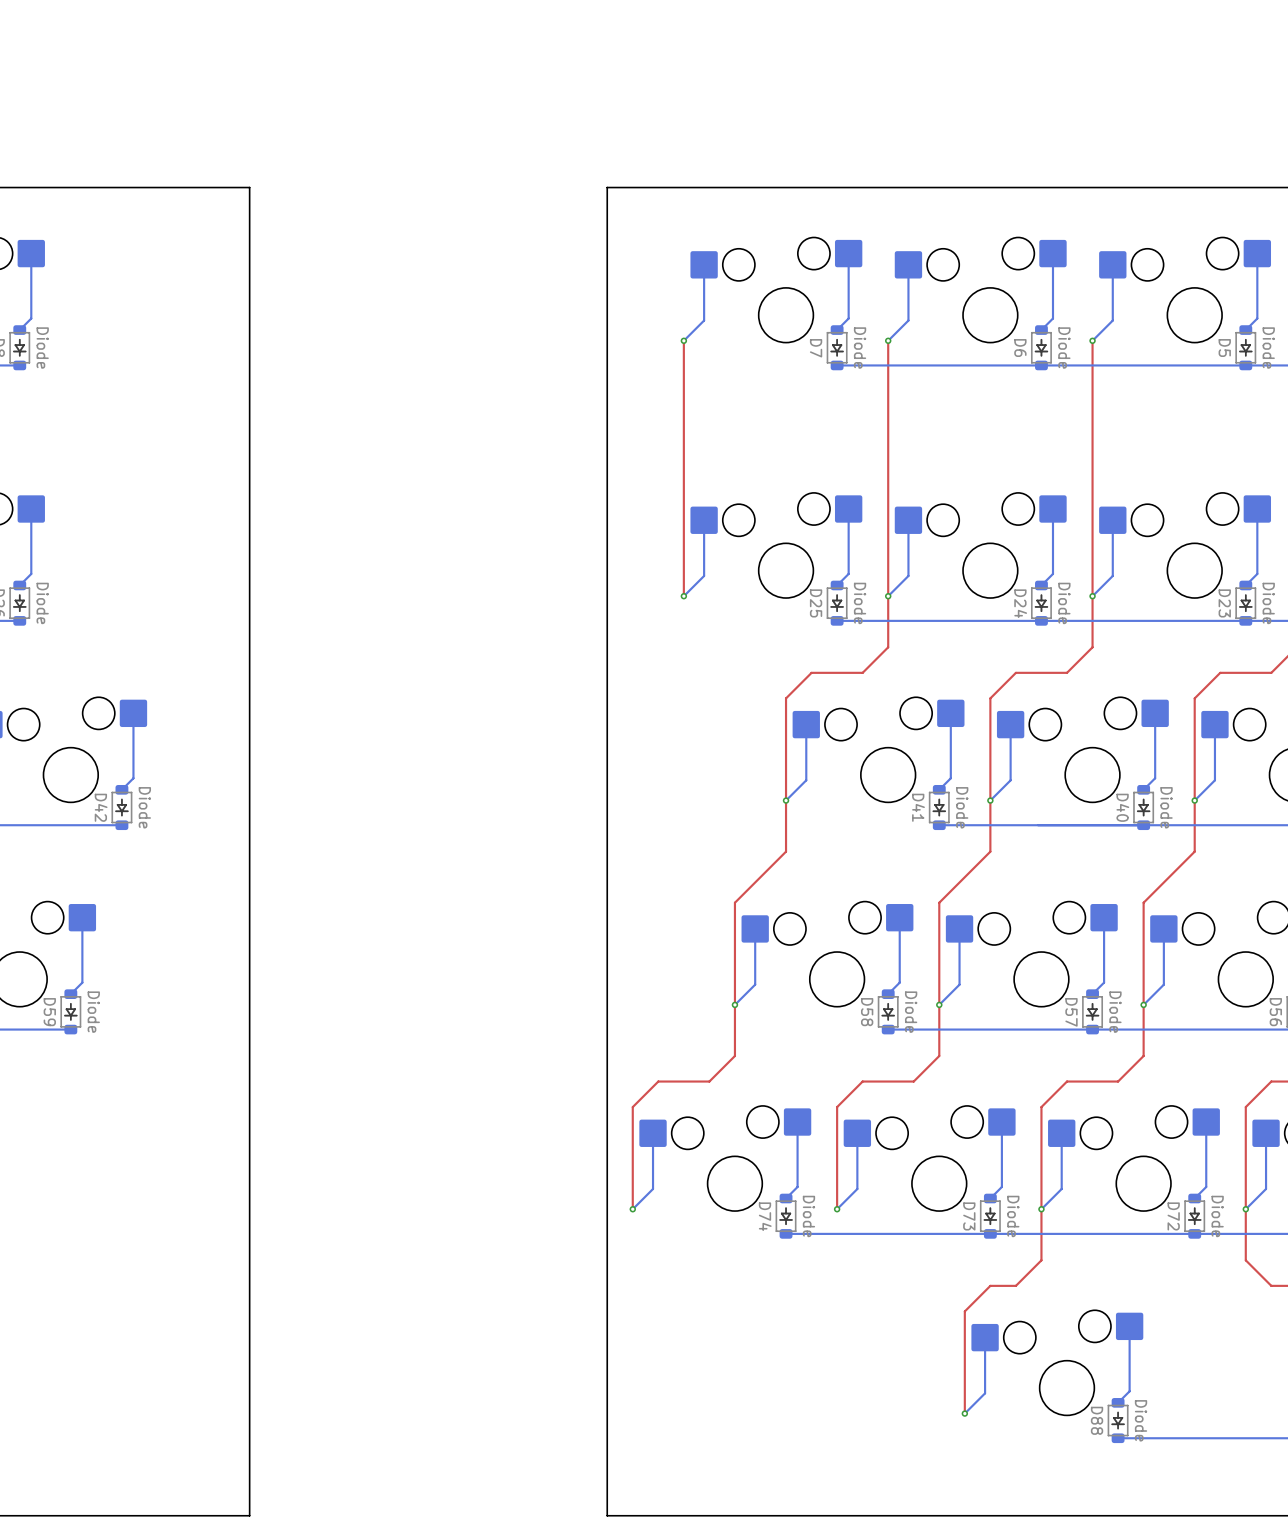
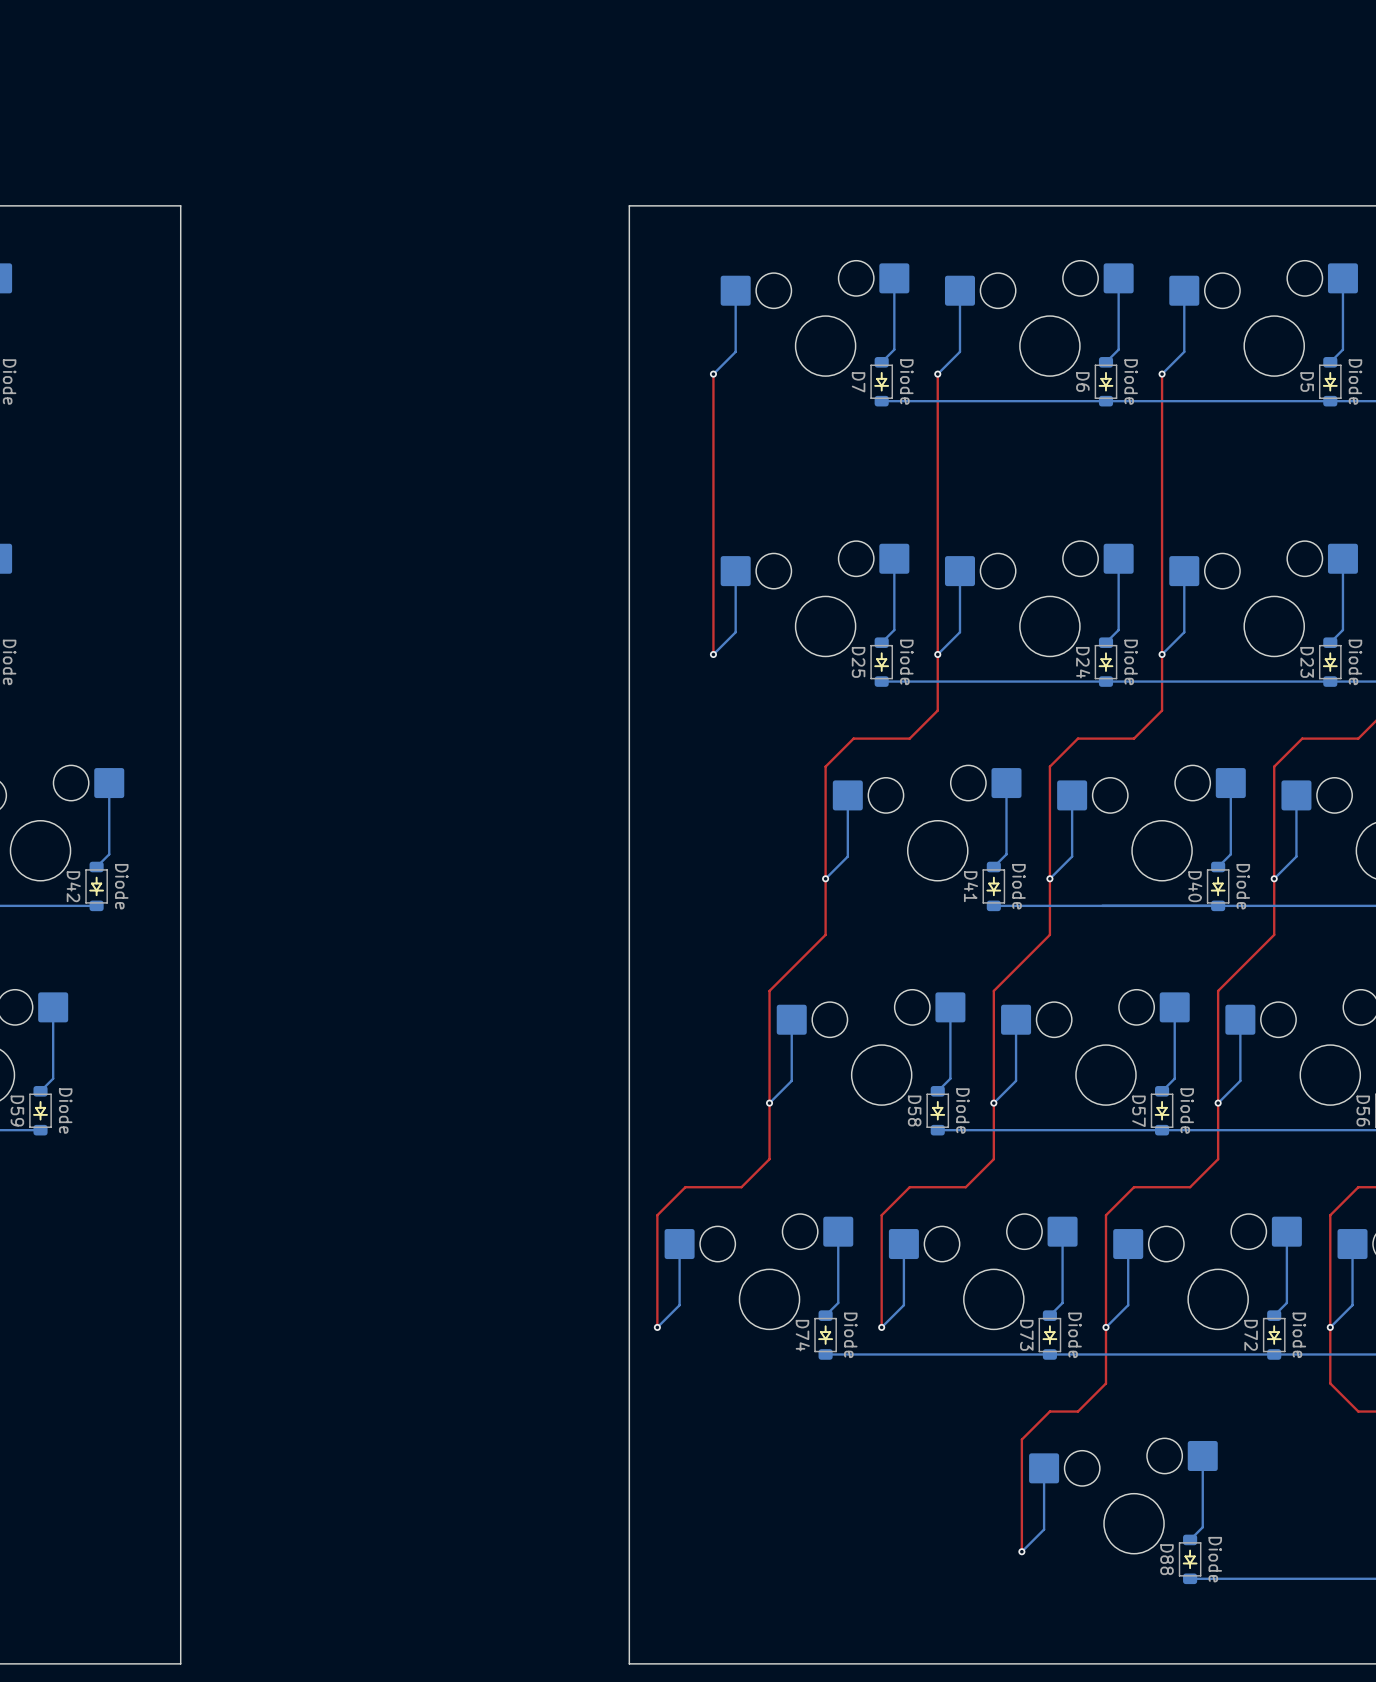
board edge: (198, 187) (249, 187) (249, 1515) (198, 1515) -> (180, 205) (180, 1663)

